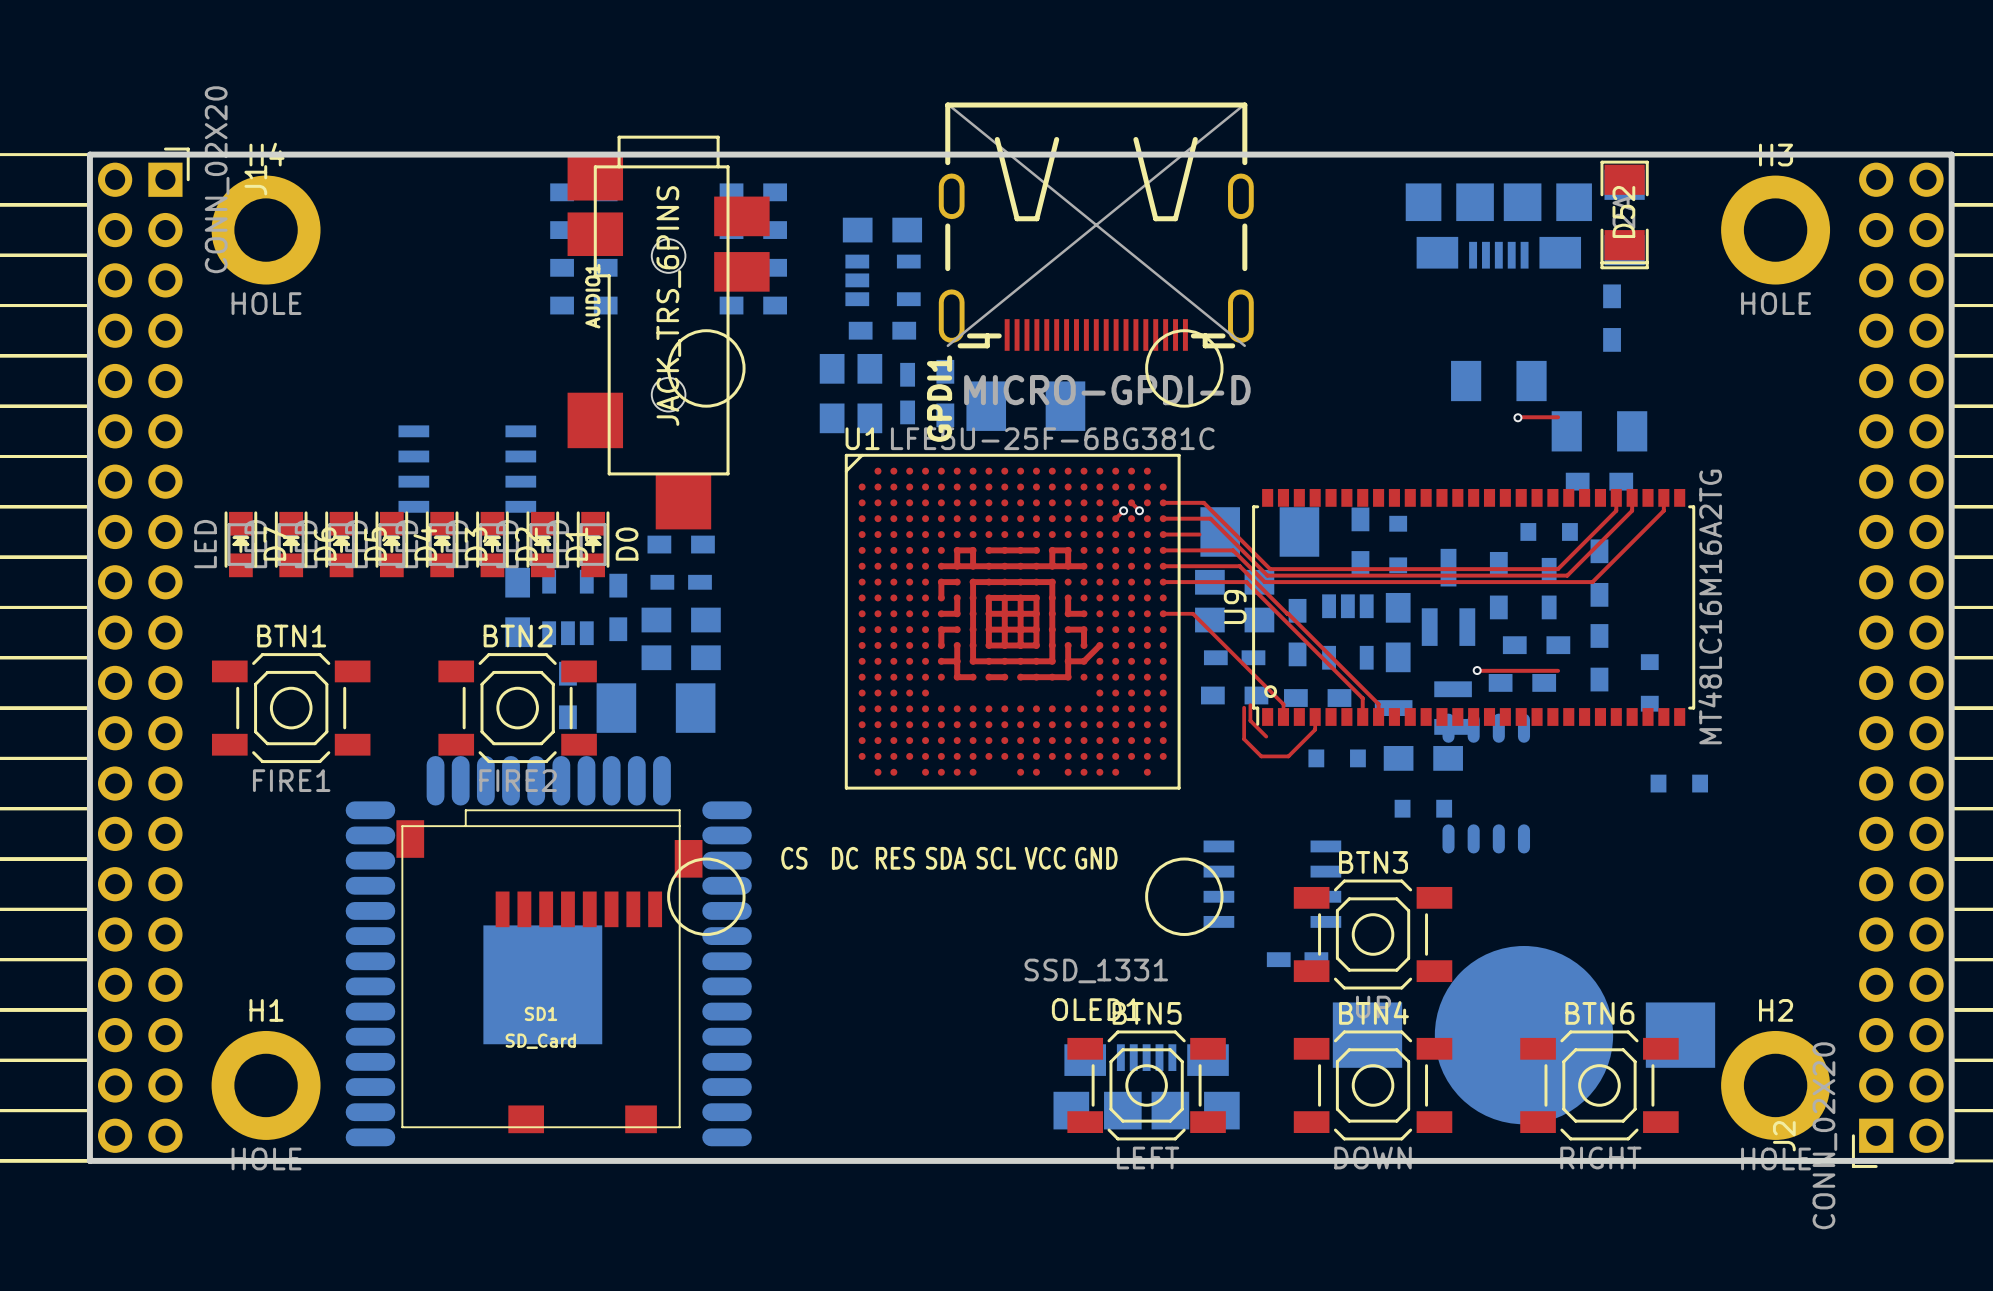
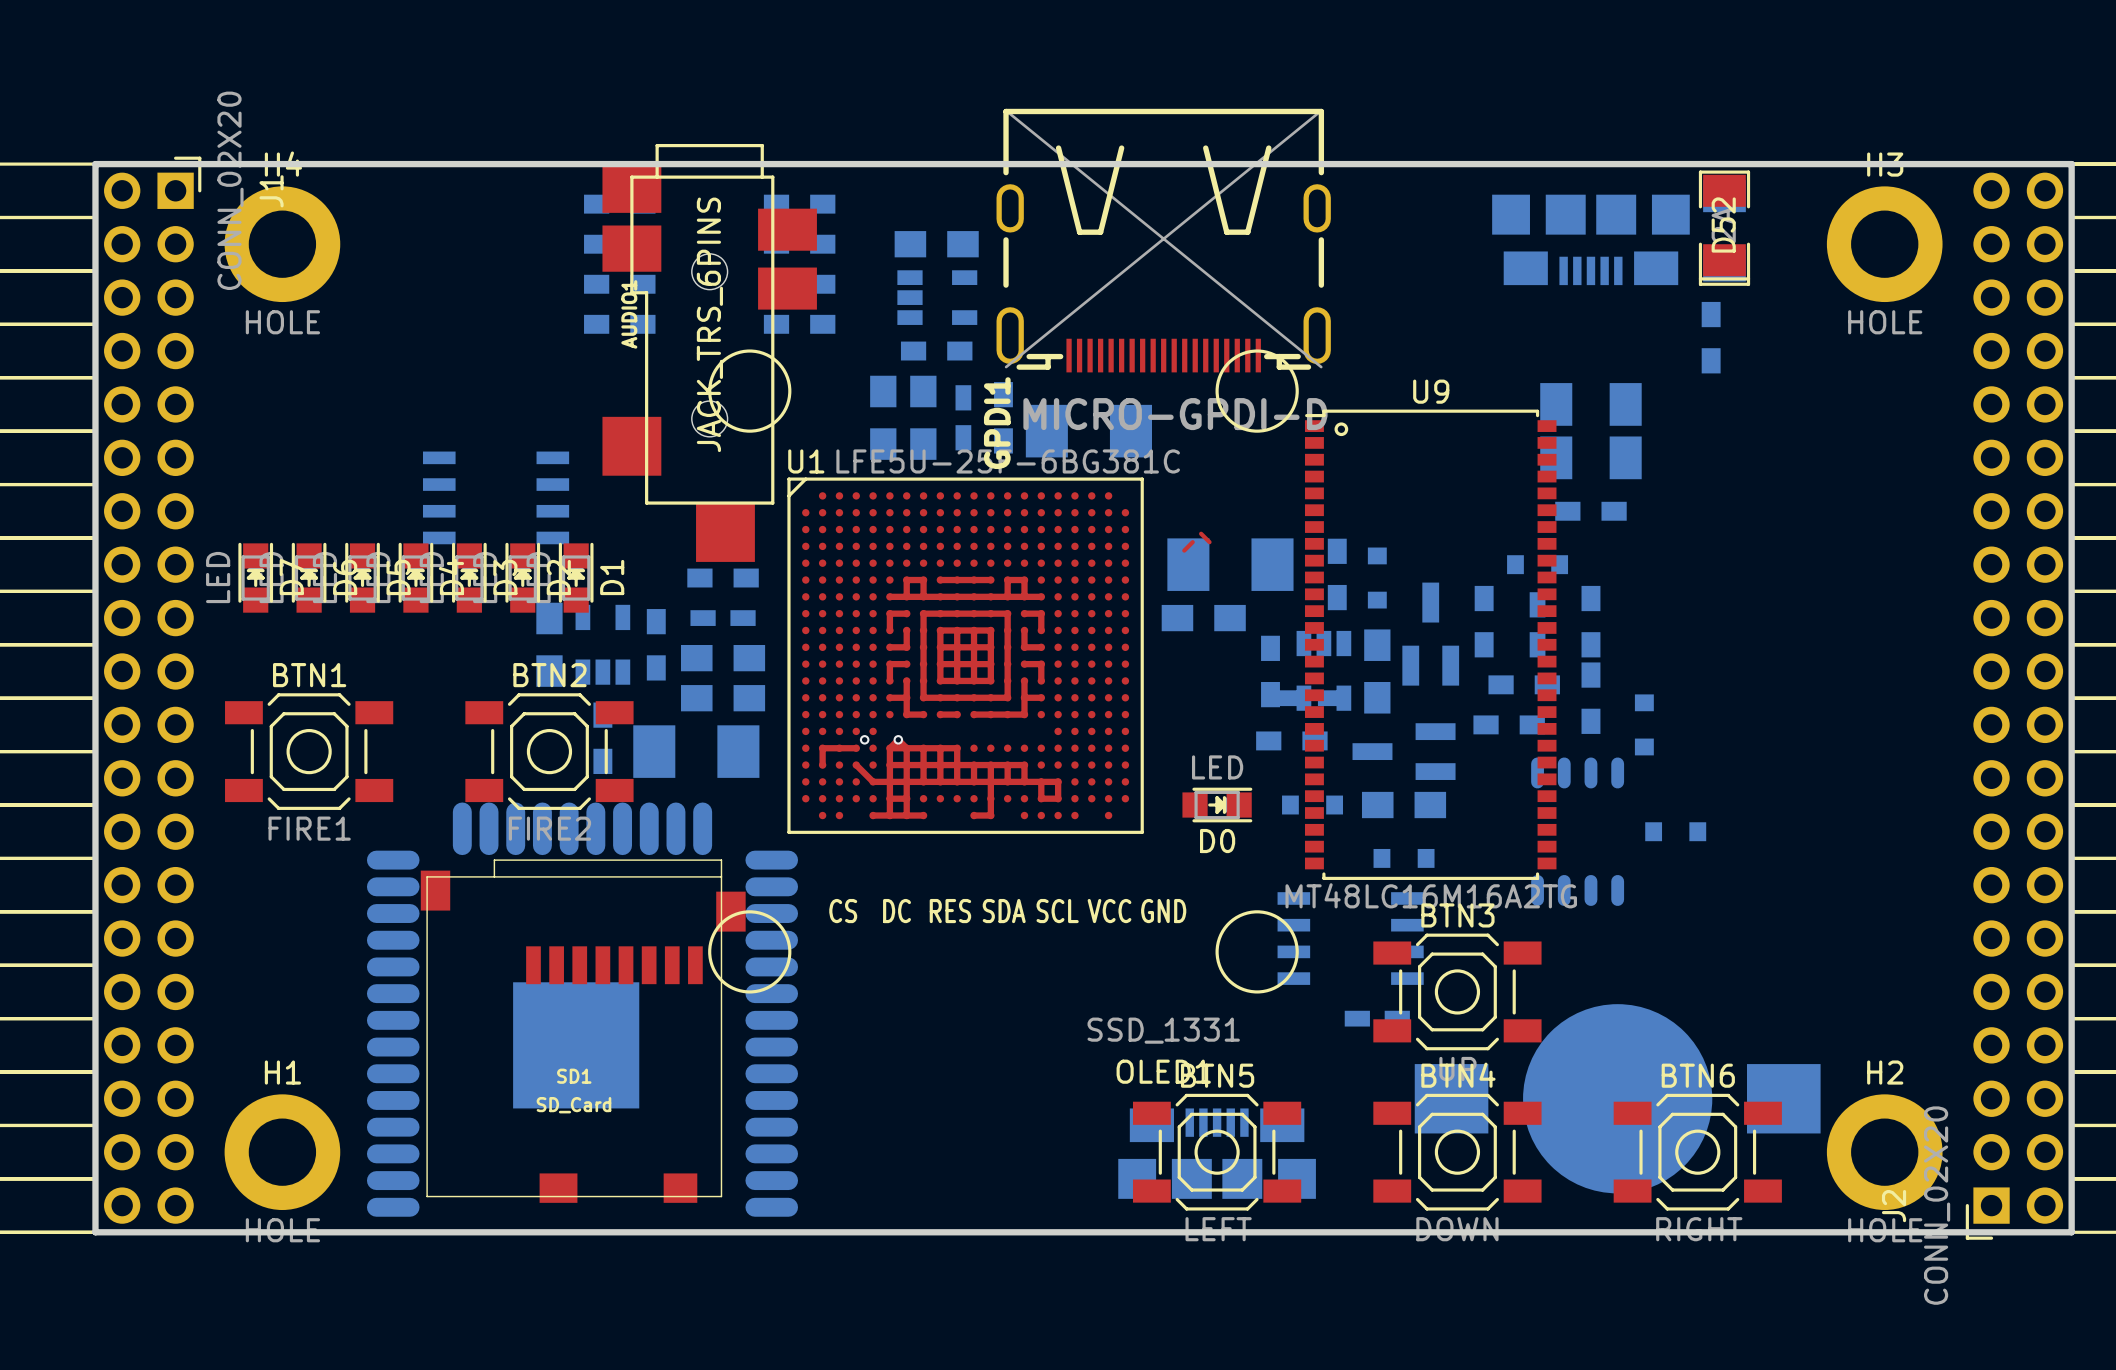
via: (1517, 417) -> none
top track: (1558, 417) (1517, 417) -> none
part position: (1599, 431) -> (1590, 457)
part: none -> (1590, 511)
part: (1599, 481) -> none
top track: (1616, 497) (1616, 510) (1557, 569) (1270, 569) (1203, 502) (1163, 502) -> none
top track: (1632, 497) (1632, 510) (1567, 575) (1267, 575) (1210, 518) (1163, 518) -> none
top track: (1663, 497) (1663, 510) (1592, 582) (1264, 582) (1233, 550) (1163, 550) -> none
part footprint: [1200, 507, 1320, 557] -> [1327, 538, 1347, 611]
via: (1123, 510) -> none
via: (1139, 510) -> none
part: none -> (1230, 564)
part: none -> (1537, 564)
part: (1549, 531) -> none
top track: (1163, 534) (1199, 534) -> none
part position: (1360, 541) -> (1484, 621)
D0 rotation: 0° (593, 544) -> 90° clockwise (1217, 805)
D0 position: (593, 544) -> (1217, 805)
part: none -> (1377, 578)
part: (1398, 544) -> none
part footprint: [1421, 548, 1476, 646] -> [1529, 592, 1546, 658]
top track: (988, 550) (1036, 550) -> (940, 580) (990, 580)
top track: (941, 566) (1084, 566) -> (889, 596) (1041, 596)
top track: (957, 566) (957, 550) (973, 550) (973, 566) -> (906, 596) (906, 580) (923, 580) (923, 596)
top track: (1052, 566) (1052, 550) (1068, 550) (1068, 566) -> (1007, 596) (1007, 580) (1024, 580) (1024, 596)
top track: (1163, 566) (1239, 566) (1378, 704) (1378, 716) -> none
part: (1599, 573) -> none
top track: none -> (1024, 613) (1041, 613) (1041, 630)
top track: (957, 582) (941, 582) (941, 597) -> (906, 613) (889, 613) (889, 630)
top track: (973, 582) (973, 661) (1052, 661) (1052, 582) (973, 582) -> (923, 613) (923, 697) (1007, 697) (1007, 613) (923, 613)
top track: (1163, 582) (1246, 582) (1362, 698) (1362, 716) -> none
part position: (1234, 582) -> (1203, 618)
part: (1549, 588) -> none
top track: (957, 597) (957, 613) (941, 613) -> (906, 630) (906, 647) (889, 647)
top track: (988, 597) (988, 645) (1036, 645) (1036, 597) (988, 597) -> (940, 630) (940, 680) (990, 680) (990, 630) (940, 630)
top track: (1004, 597) (1004, 645) -> (957, 630) (957, 680)
top track: (1020, 597) (1020, 645) -> (974, 630) (974, 680)
top track: (1068, 597) (1068, 613) (1084, 613) -> (1024, 630) (1024, 647) (1041, 647)
part footprint: [1288, 598, 1307, 667] -> [1364, 629, 1391, 714]
part footprint: [1195, 607, 1275, 633] -> [1296, 630, 1352, 711]
U9 rotation: 0° (1473, 607) -> 90° clockwise (1430, 644)
top track: (988, 613) (1036, 613) -> (940, 647) (990, 647)
top track: (1163, 613) (1192, 613) (1283, 704) (1283, 716) -> none
U1 position: (1012, 621) -> (965, 655)
top track: (957, 629) (941, 629) (941, 645) -> (906, 664) (889, 664) (889, 680)
top track: (988, 629) (1036, 629) -> (940, 664) (990, 664)
top track: (1068, 629) (1084, 629) (1084, 645) -> (1024, 664) (1041, 664) (1041, 680)
part: none -> (1270, 671)
part: (1347, 632) -> none
part: (1398, 632) -> none
top track: (957, 645) (957, 677) (973, 677) -> (906, 680) (906, 714) (923, 714)
top track: (1068, 645) (1068, 677) (1020, 677) -> (1024, 680) (1024, 714) (974, 714)
top track: (1099, 645) (1084, 661) (1068, 661) -> none
part: none -> (1524, 684)
part: (1536, 645) -> none
top track: none -> (1024, 697) (1041, 697)
part: none -> (1590, 698)
part: (1599, 657) -> none
top track: (941, 661) (957, 661) -> (889, 697) (906, 697)
top track: (1477, 670) (1558, 670) -> none
via: (1477, 670) -> none
top track: (988, 677) (1004, 677) -> (940, 714) (957, 714)
part: none -> (1509, 724)
part: (1522, 682) -> none
part: none -> (1644, 724)
part: (1649, 682) -> none
part footprint: [1284, 689, 1352, 707] -> [1352, 723, 1456, 780]
part position: (1234, 695) -> (1291, 740)
via: none -> (864, 739)
via: none -> (898, 739)
top track: none -> (856, 748) (822, 748) (822, 765)
top track: none -> (889, 748) (957, 748) (957, 781)
top track: none -> (889, 748) (889, 815)
top track: none -> (889, 748) (898, 739) (906, 748) (906, 815)
top track: none -> (923, 748) (923, 781)
top track: none -> (940, 748) (940, 781)
top track: (1250, 705) (1250, 720) (1266, 736) -> none
top track: (1244, 707) (1244, 739) (1261, 756) (1288, 756) (1315, 729) (1315, 716) -> none
part rotation: 0° (1423, 708) -> 90° clockwise (1430, 634)
part position: (1423, 708) -> (1430, 634)
top track: none -> (856, 765) (873, 781) (1058, 781) (1058, 798) (1041, 798) (1041, 781)
top track: none -> (889, 765) (1024, 765) (1024, 781)
top track: none -> (974, 765) (974, 781)
top track: none -> (990, 765) (990, 815) (974, 815)
top track: none -> (1007, 765) (1007, 781)
part footprint: [1308, 749, 1366, 768] -> [1361, 791, 1447, 819]
top track: none -> (889, 798) (906, 798)
part: none -> (1312, 805)
part: (1423, 758) -> none
top track: none -> (873, 815) (923, 815)
part: none -> (1675, 831)
part: (1679, 783) -> none
part: none -> (1404, 858)
part: (1423, 808) -> none

